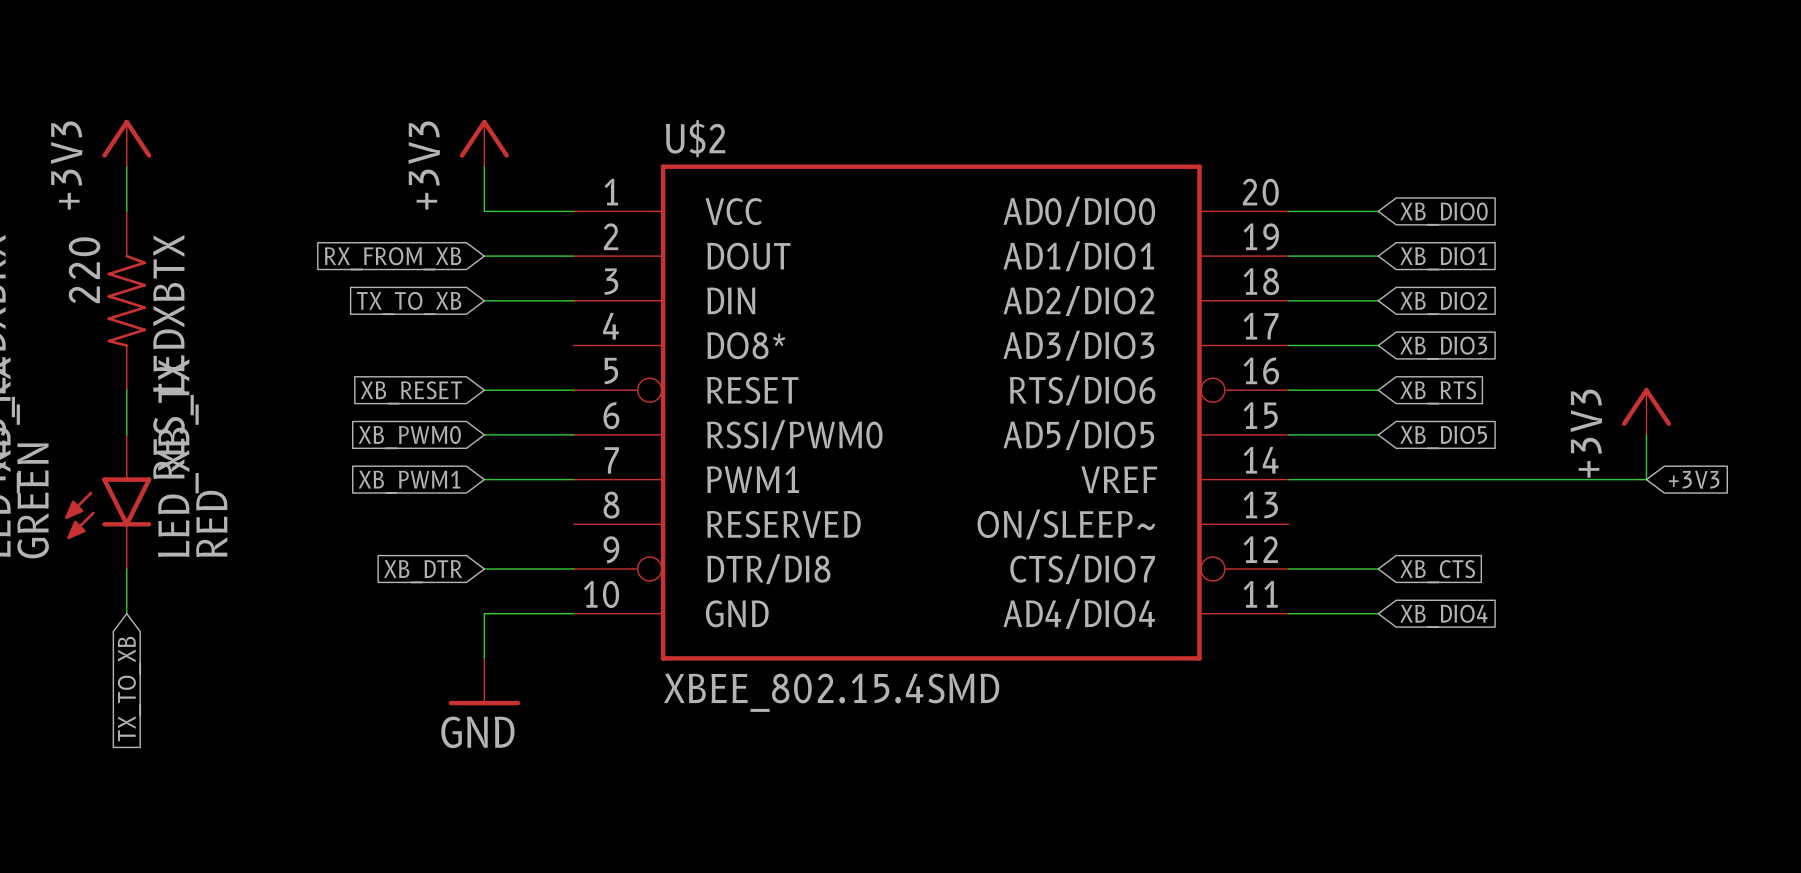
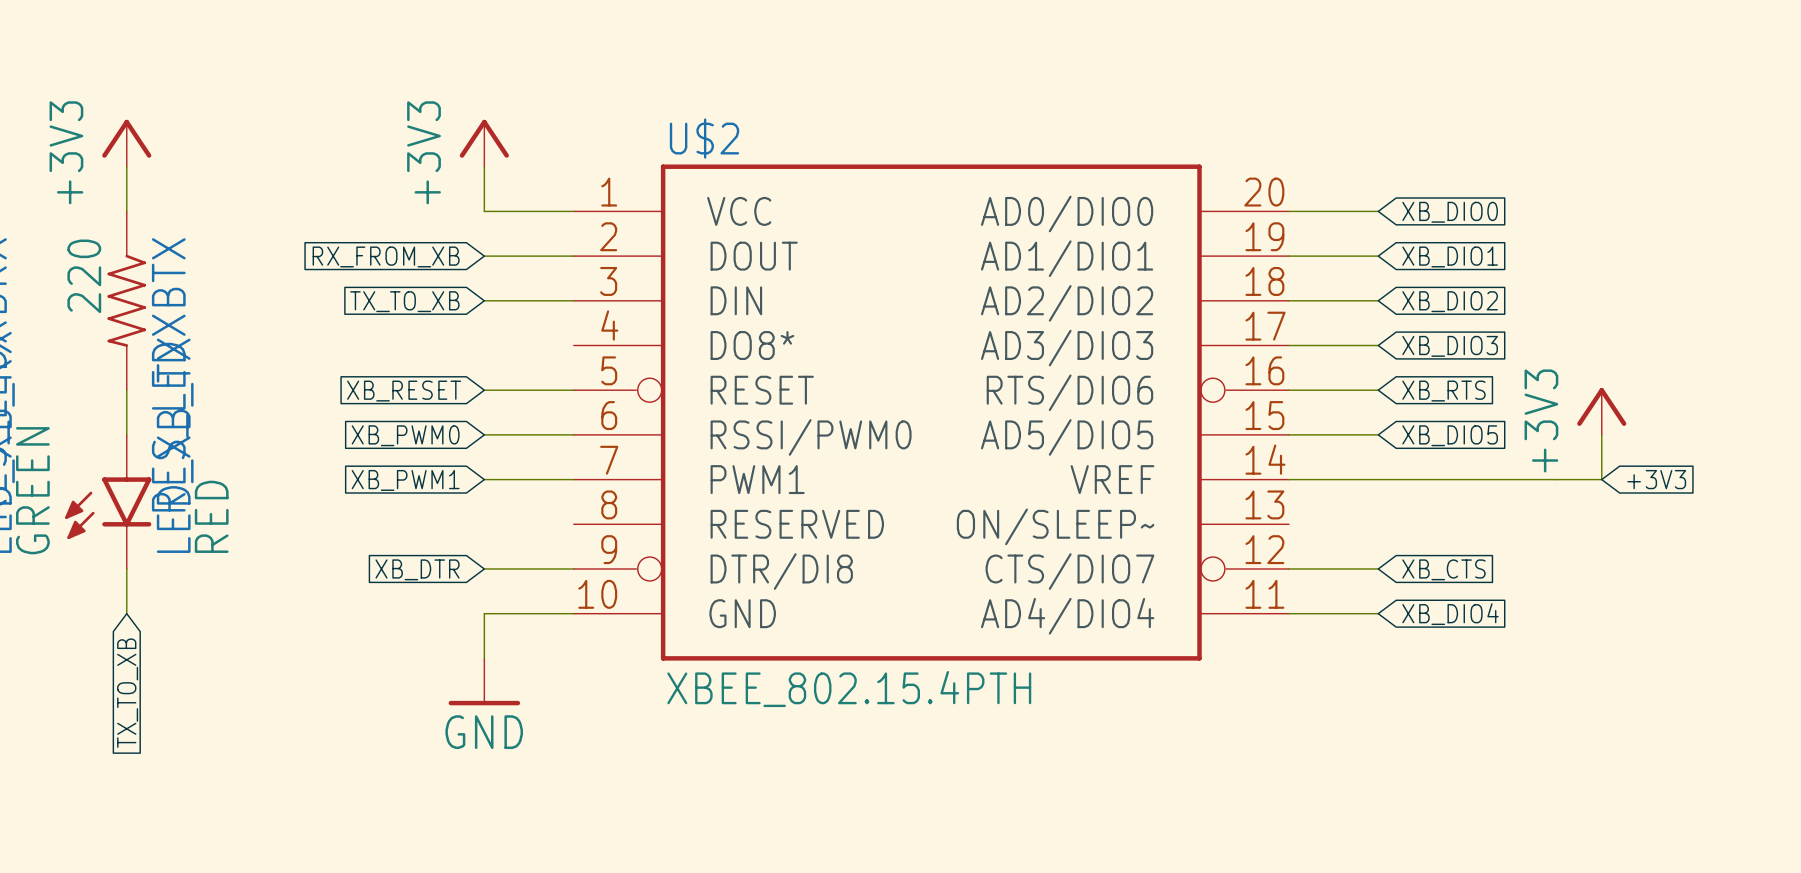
power symbol position: +3V3 (1646, 411) -> +3V3 (1601, 411)
wire: (1646, 434) (1646, 479) (1601, 479) -> (1601, 434) (1601, 479)
global label position: +3V3 (1694, 479) -> +3V3 (1656, 479)
U$2 value: XBEE_802.15.4SMD (831, 692) -> XBEE_802.15.4PTH (849, 689)

